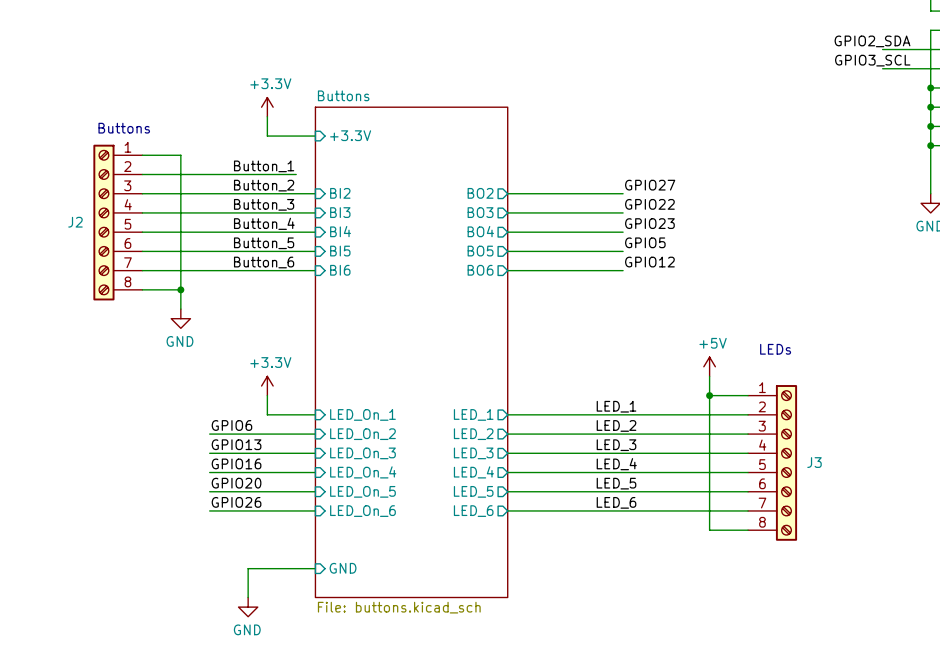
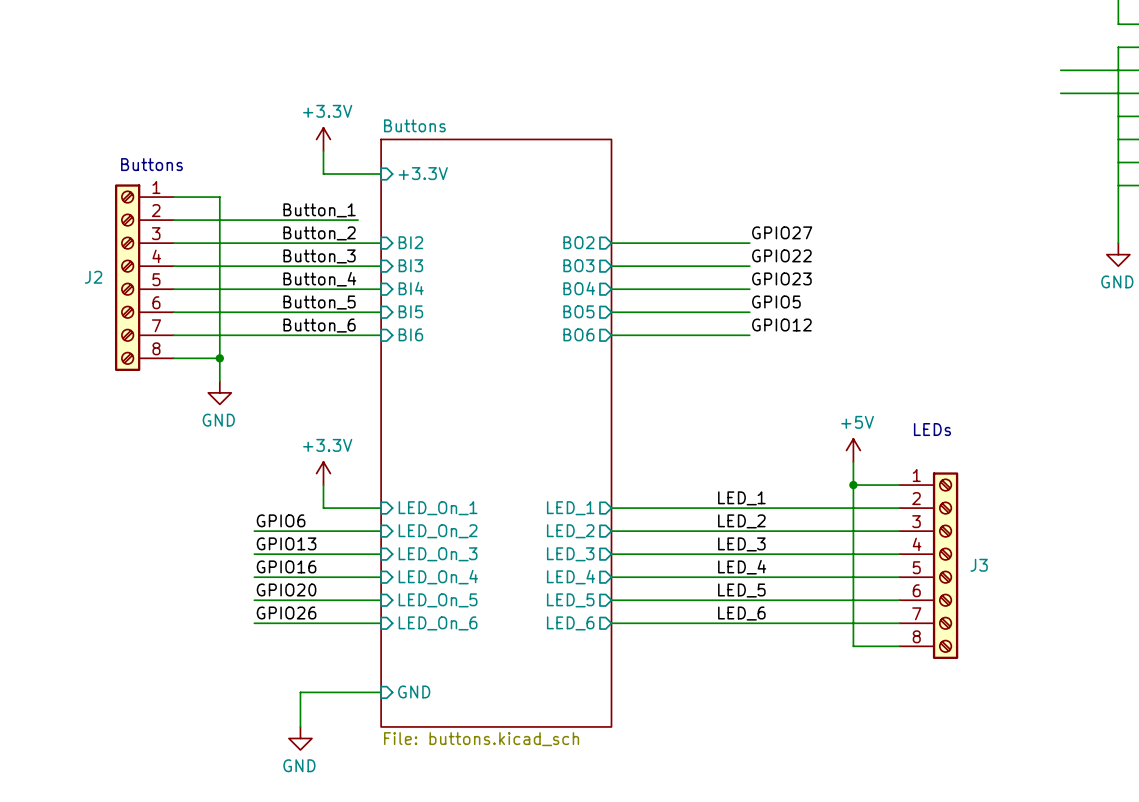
label: GPIO2_SDA (872, 41) -> none
label: GPIO3_SCL (872, 60) -> none
junction: (930, 87) -> none
junction: (930, 107) -> none
junction: (930, 126) -> none
junction: (930, 145) -> none

